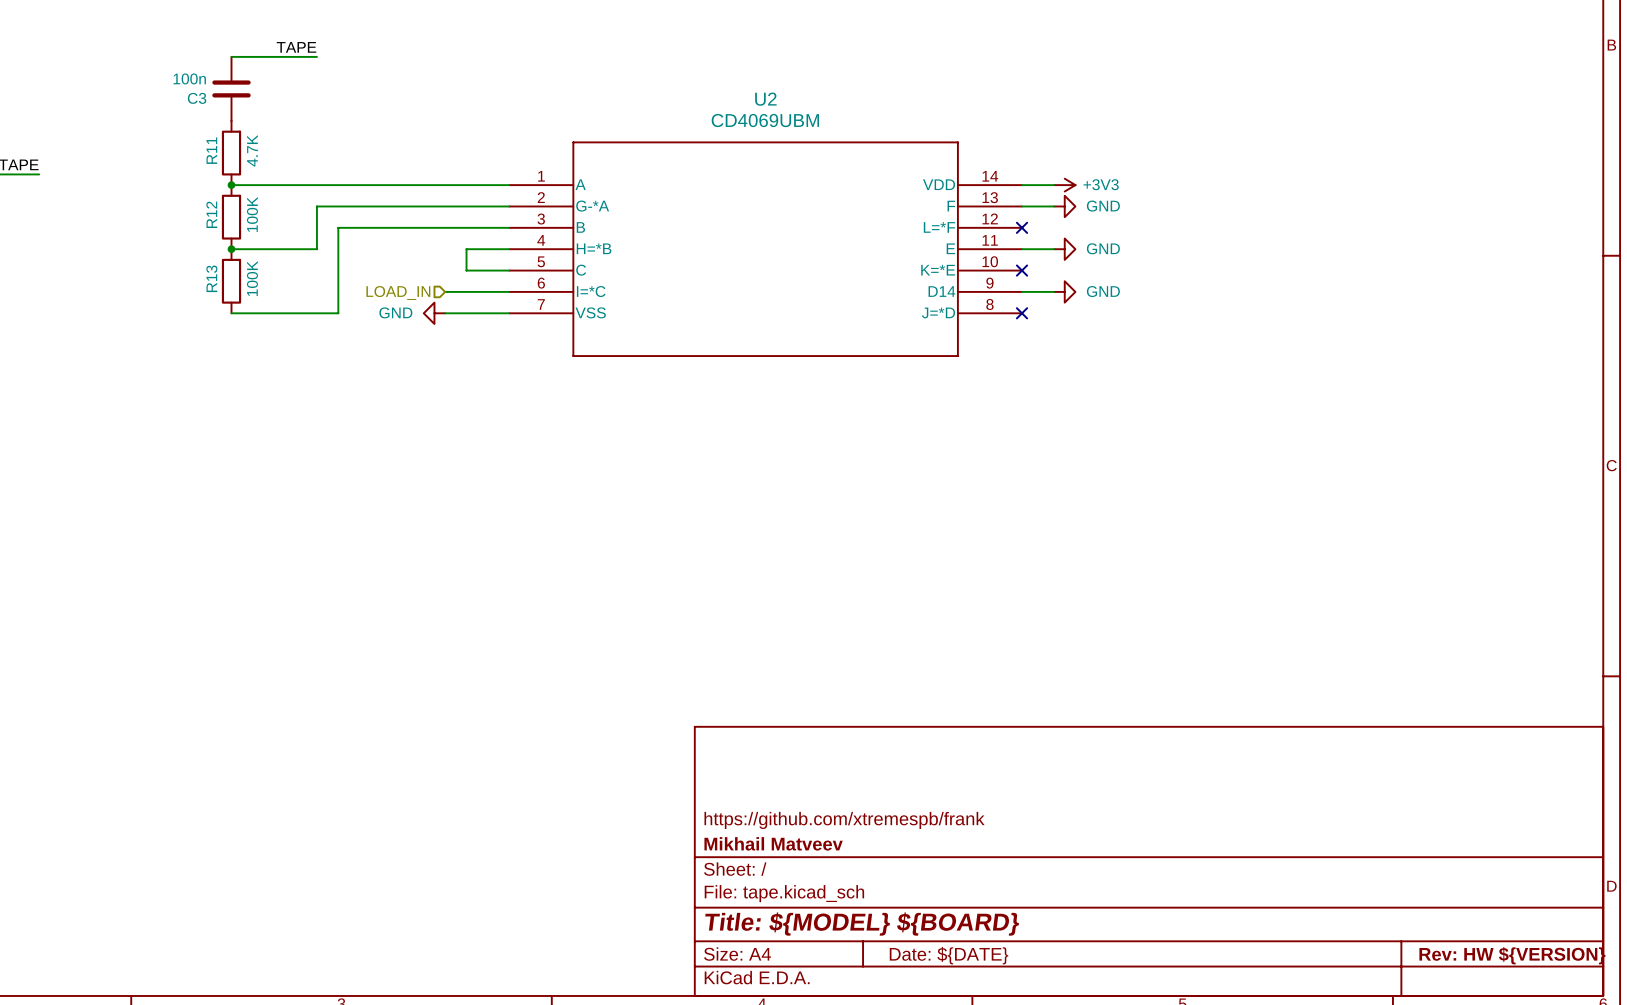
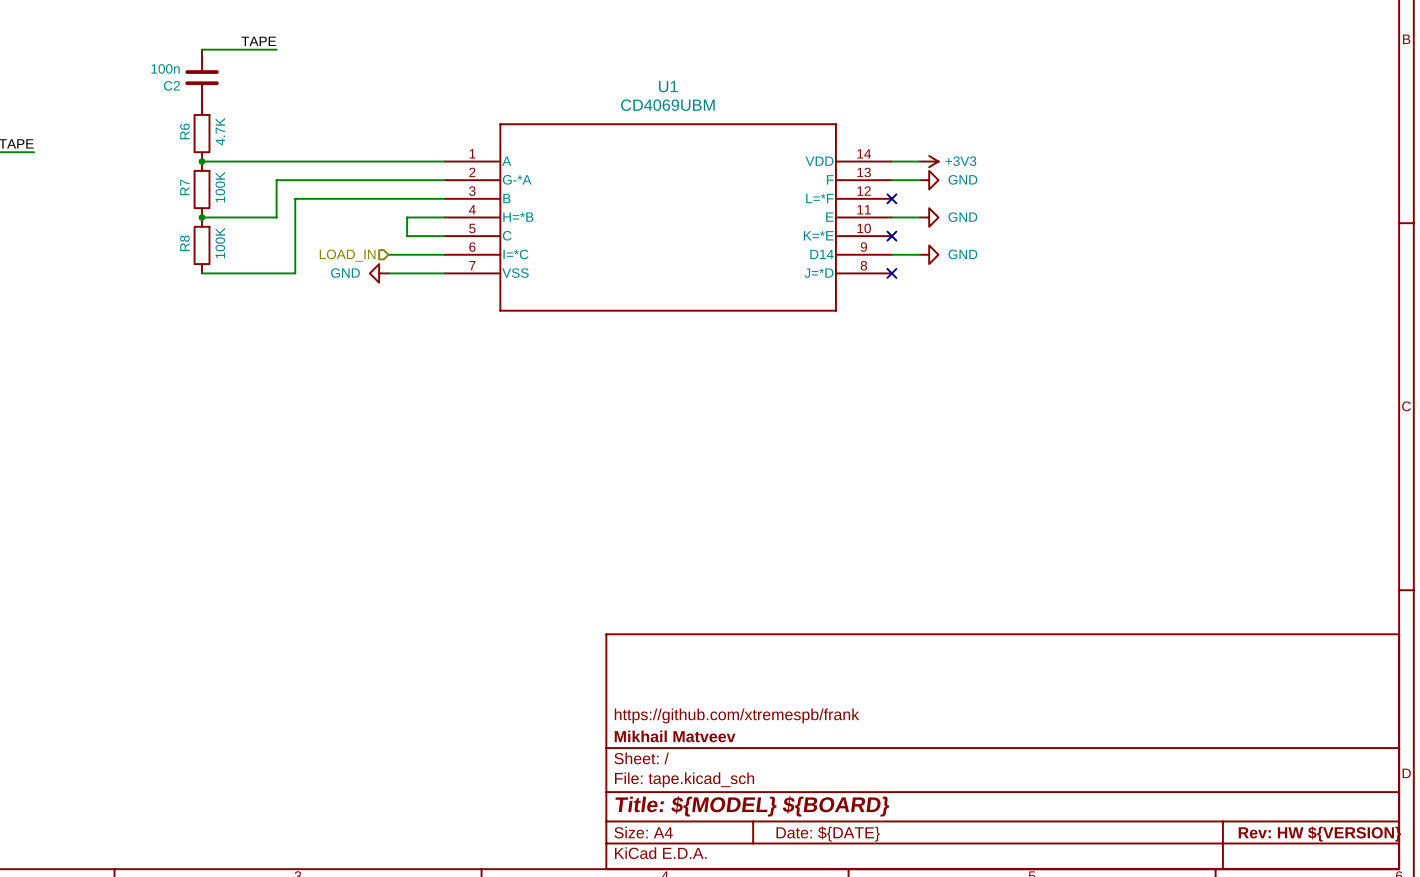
C3 name: C3 (197, 98) -> C2 (171, 85)
U2 name: U2 (765, 99) -> U1 (668, 86)
R11 name: R11 (211, 150) -> R6 (184, 131)
R12 name: R12 (211, 214) -> R7 (184, 187)
R13 name: R13 (211, 278) -> R8 (184, 243)

